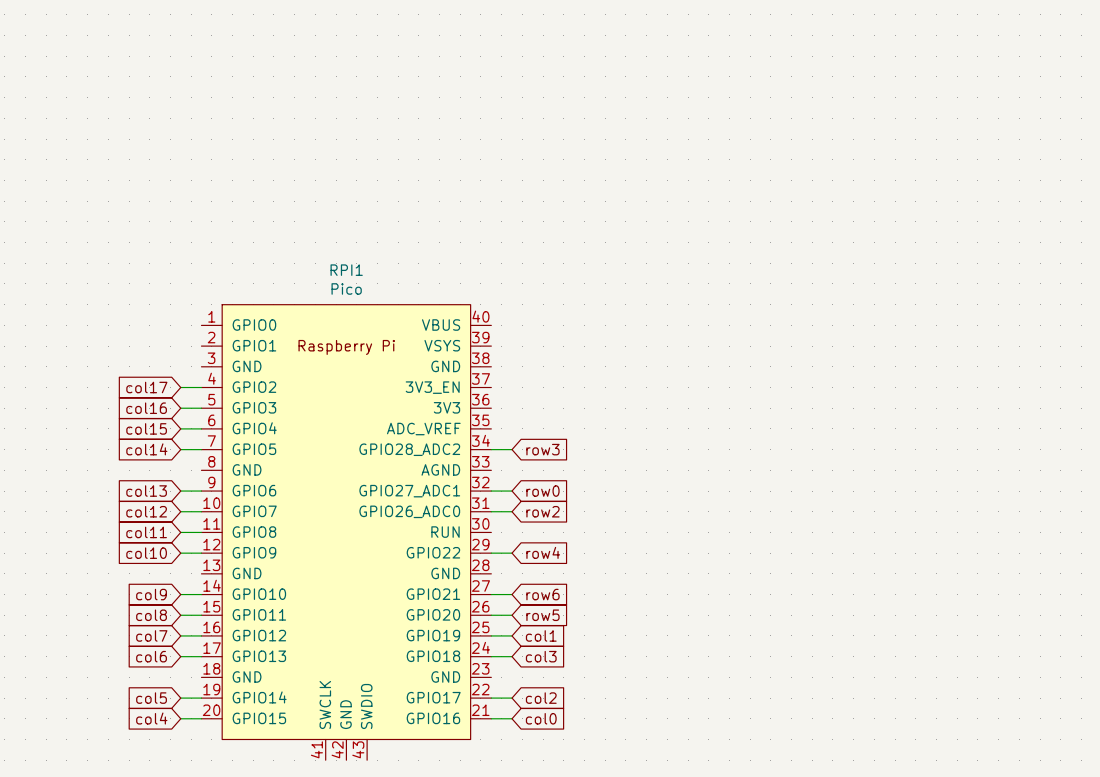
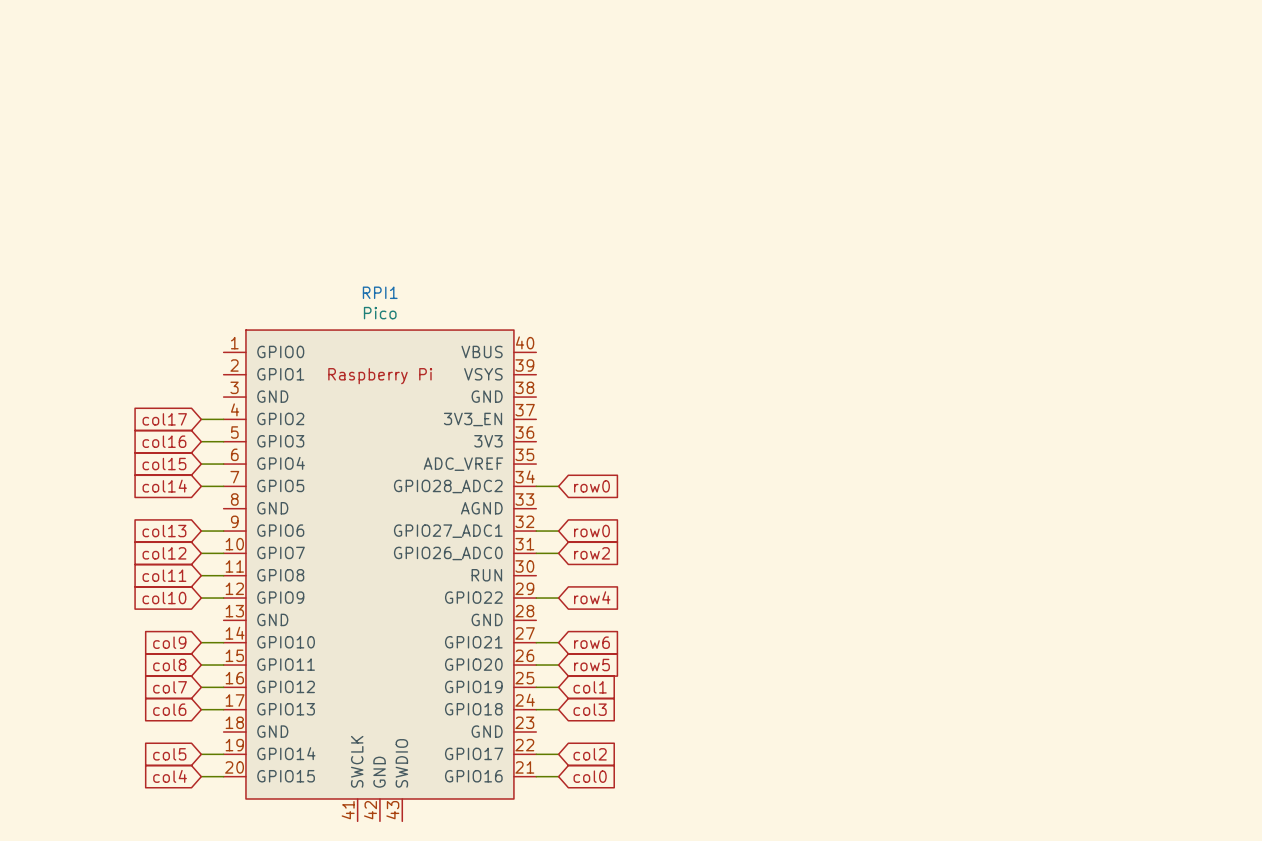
global label: row3 (542, 449) -> row0 (591, 486)

